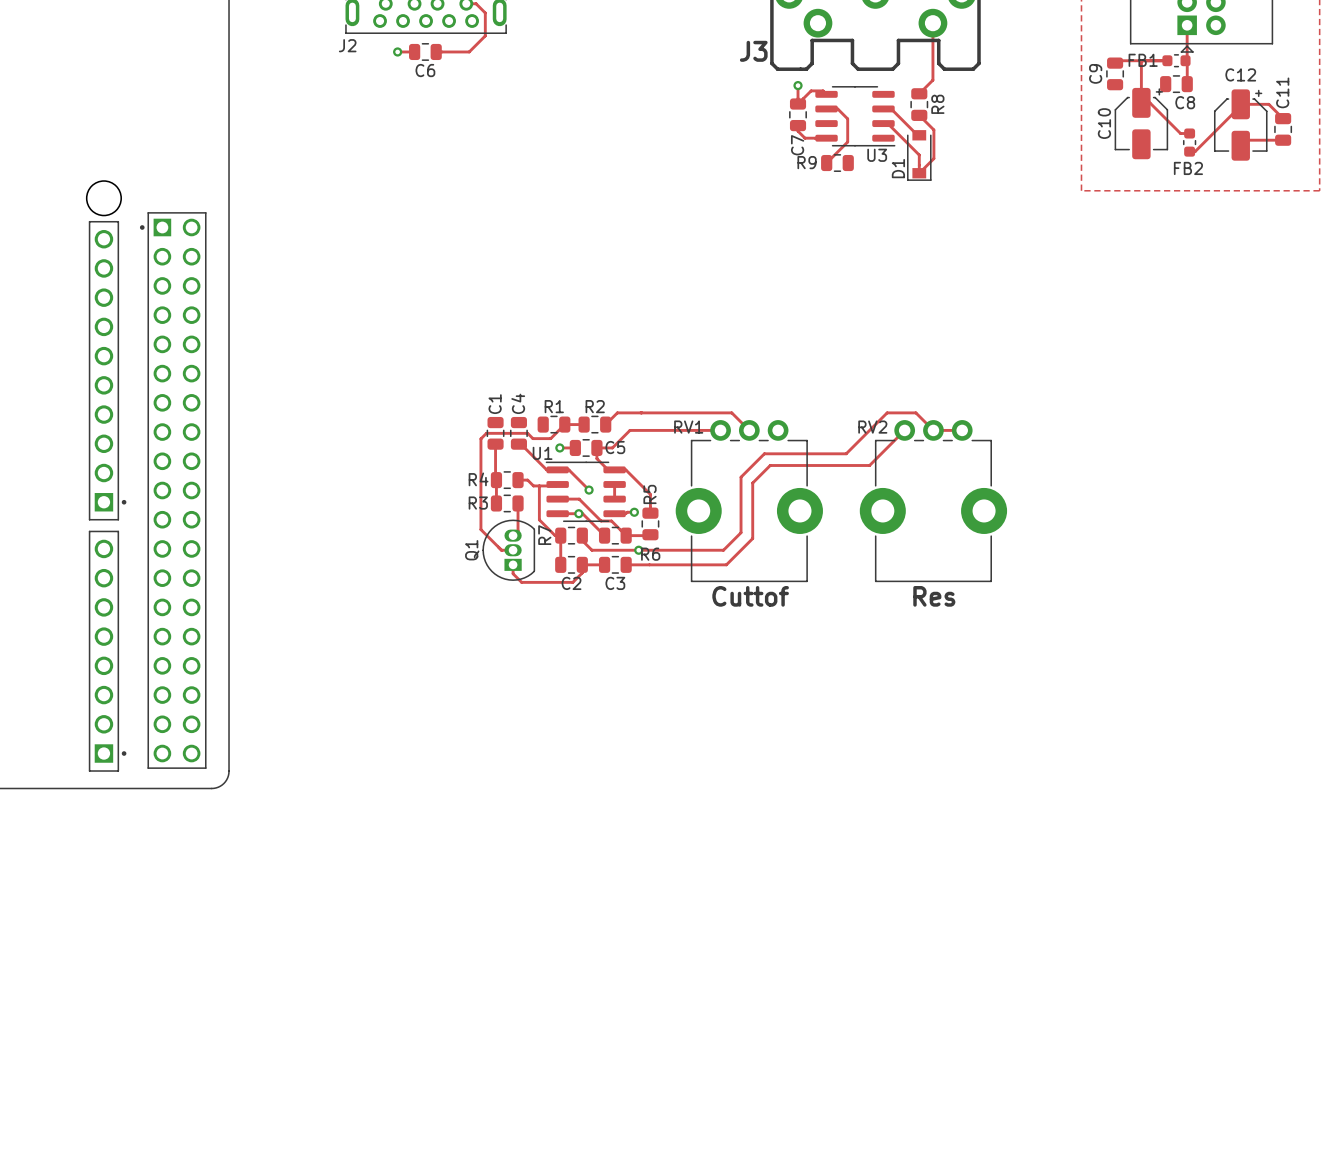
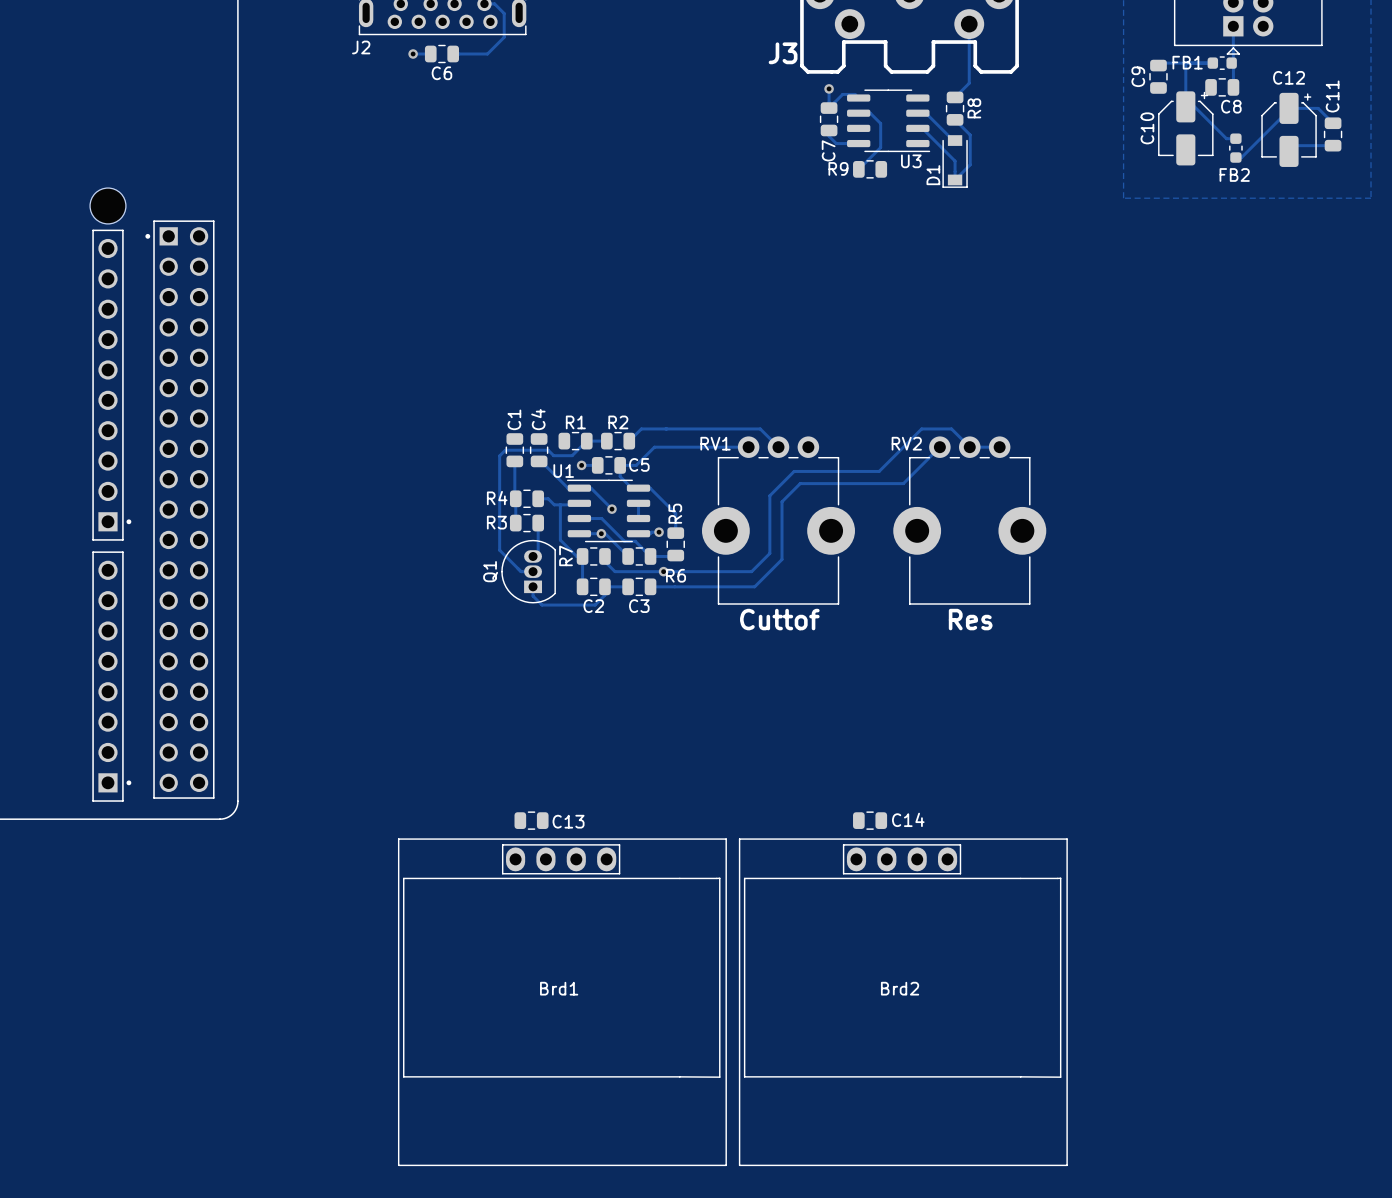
C13: none -> (531, 820)
C14: none -> (870, 820)
Brd1: none -> (562, 1002)
Brd2: none -> (903, 1002)

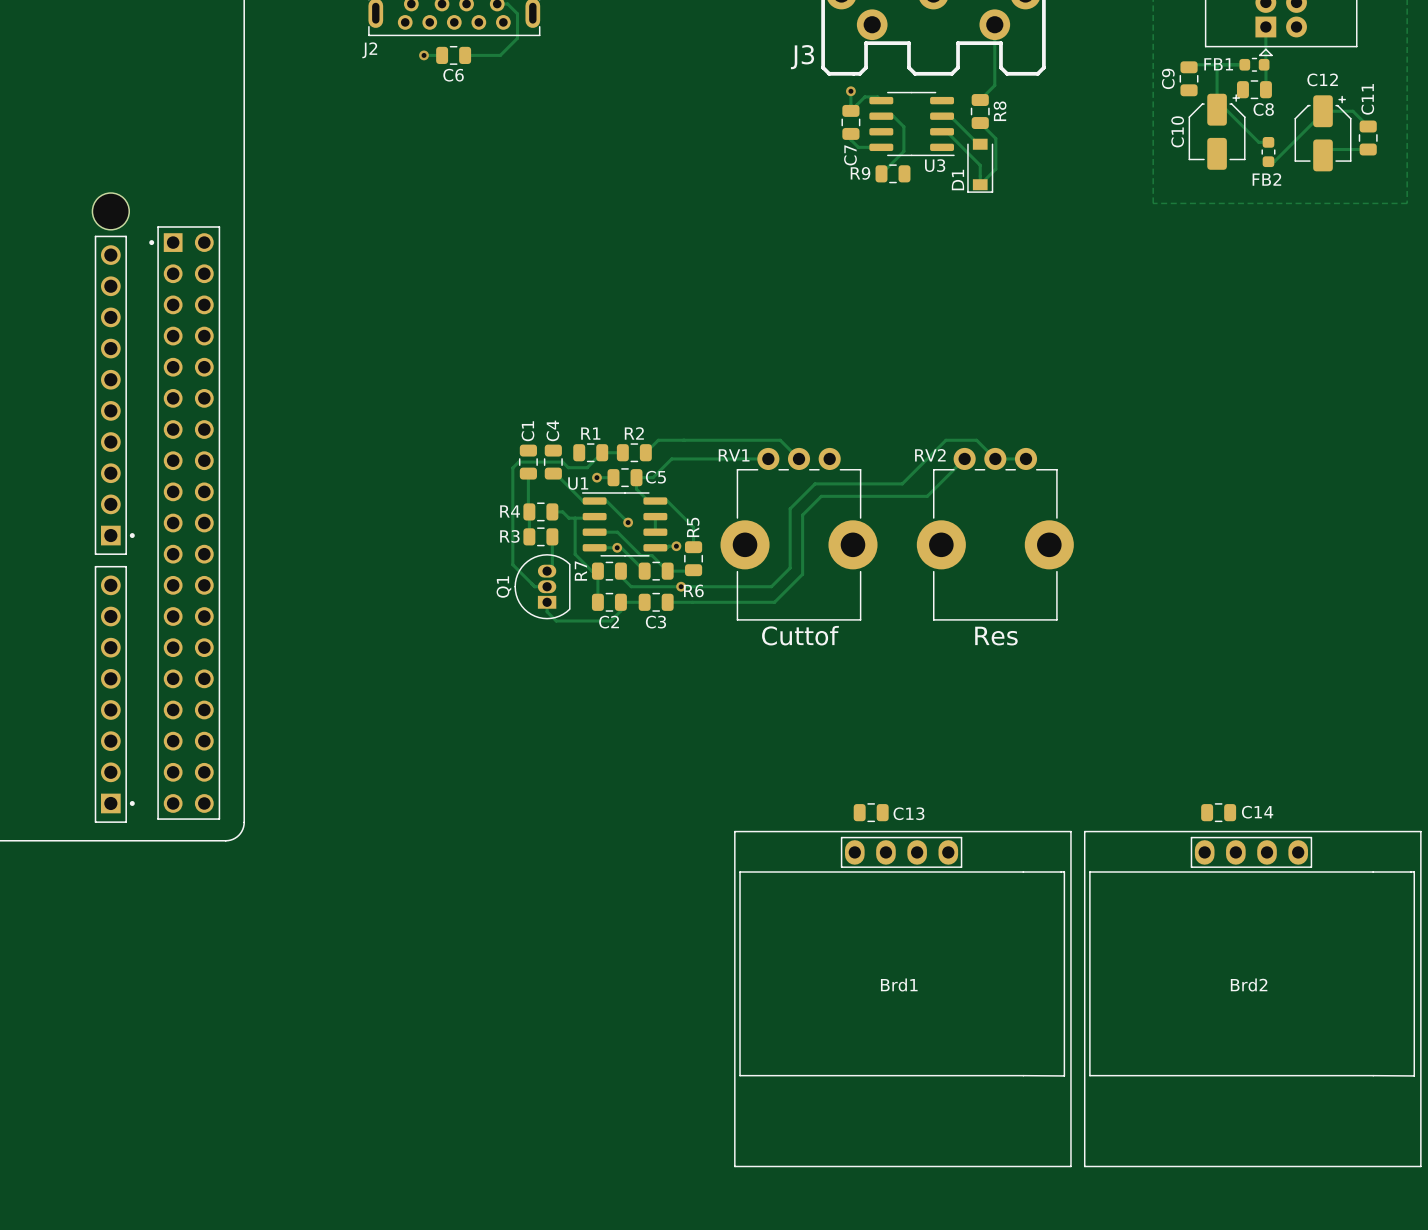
C13 position: (531, 820) -> (871, 812)
C14 position: (870, 820) -> (1218, 812)
Brd1 position: (562, 1002) -> (902, 999)
Brd2 position: (903, 1002) -> (1252, 999)

